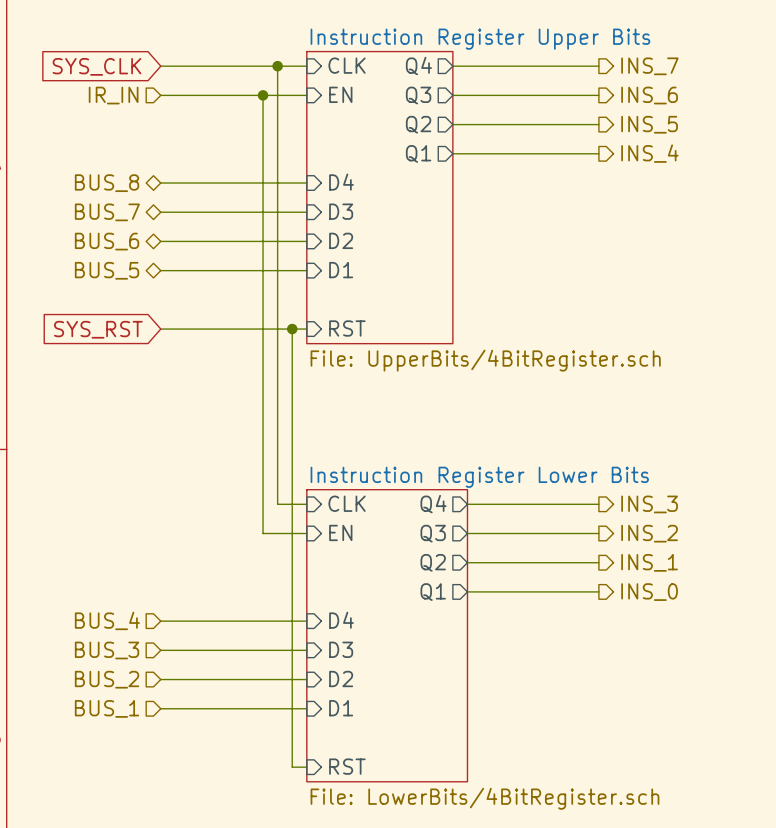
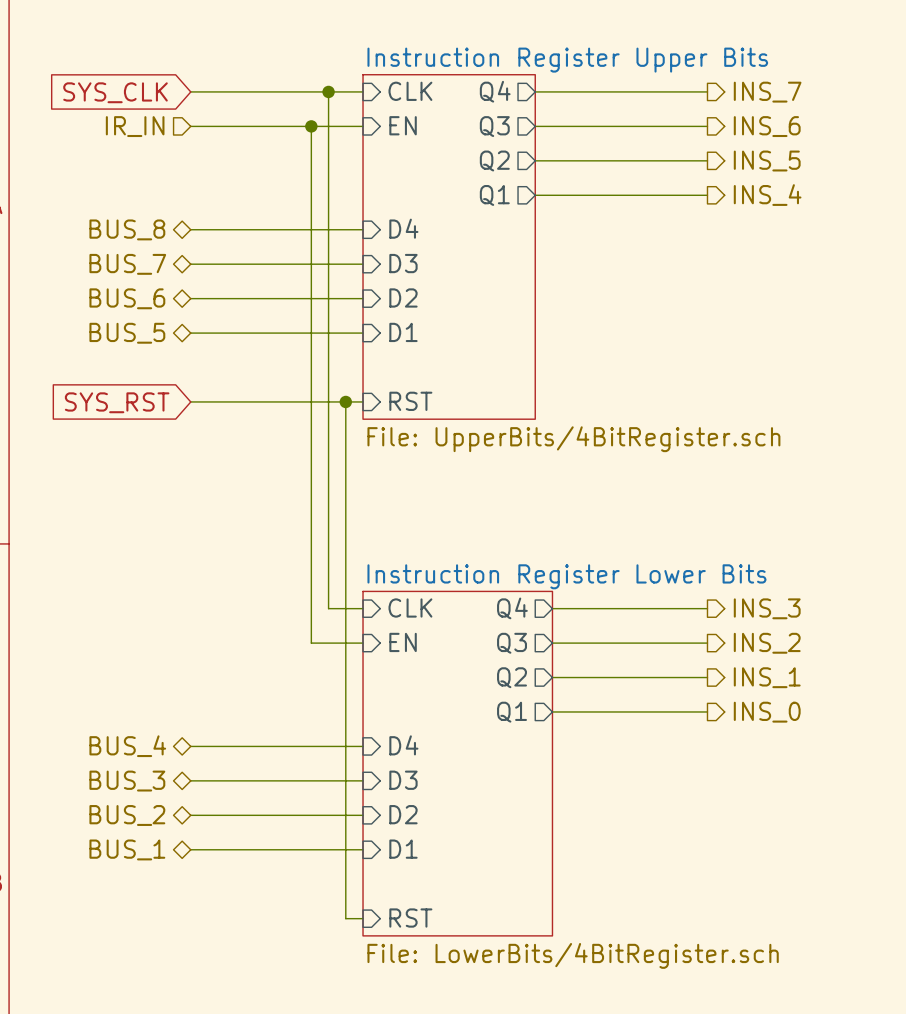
hierarchical label shape: input (107, 620) -> bidirectional (127, 746)
hierarchical label shape: input (107, 650) -> bidirectional (127, 781)
hierarchical label shape: input (107, 679) -> bidirectional (127, 815)
hierarchical label shape: input (107, 708) -> bidirectional (127, 849)

